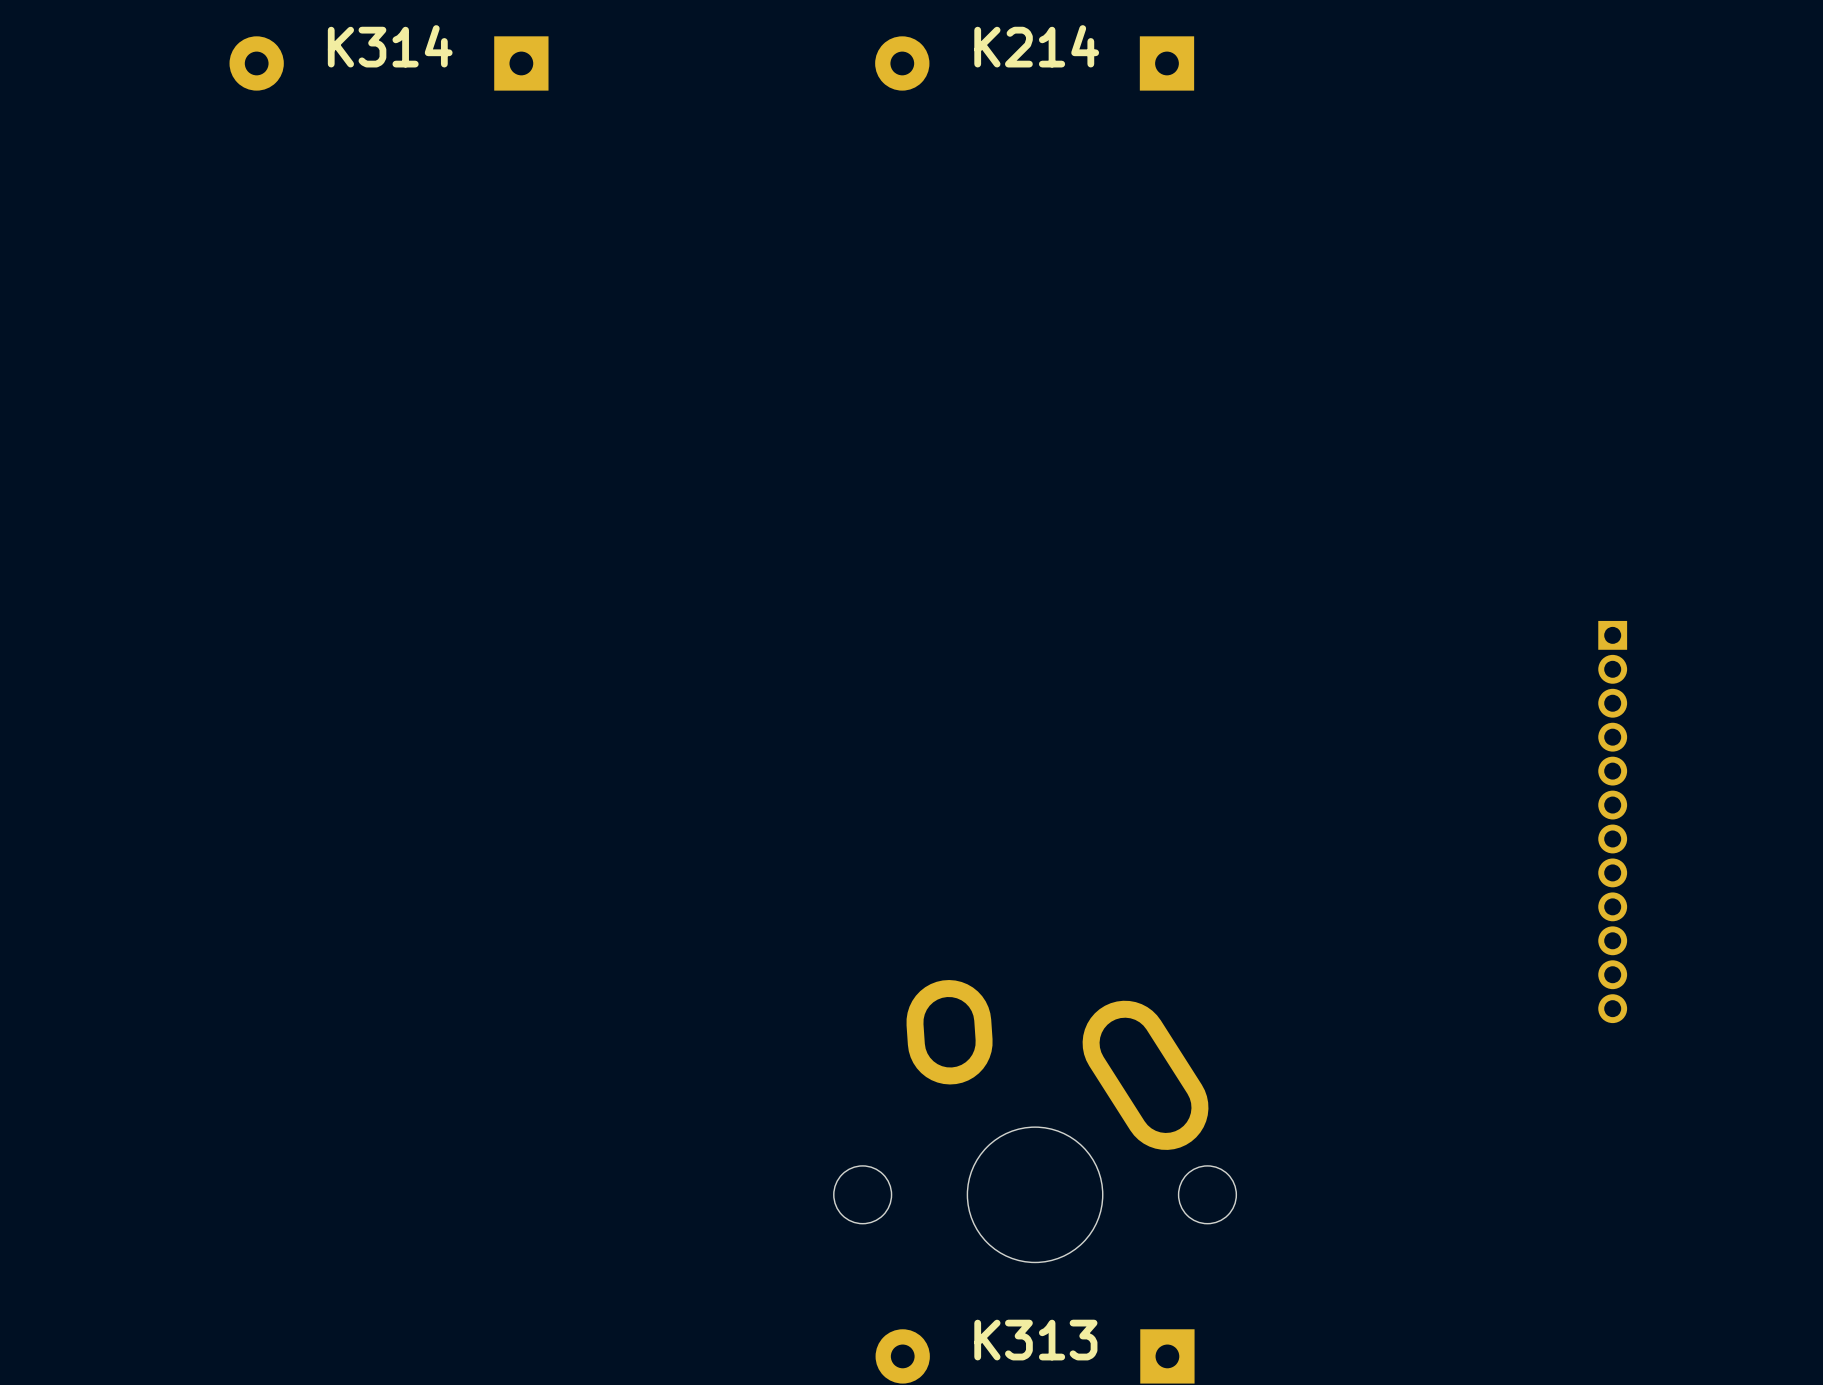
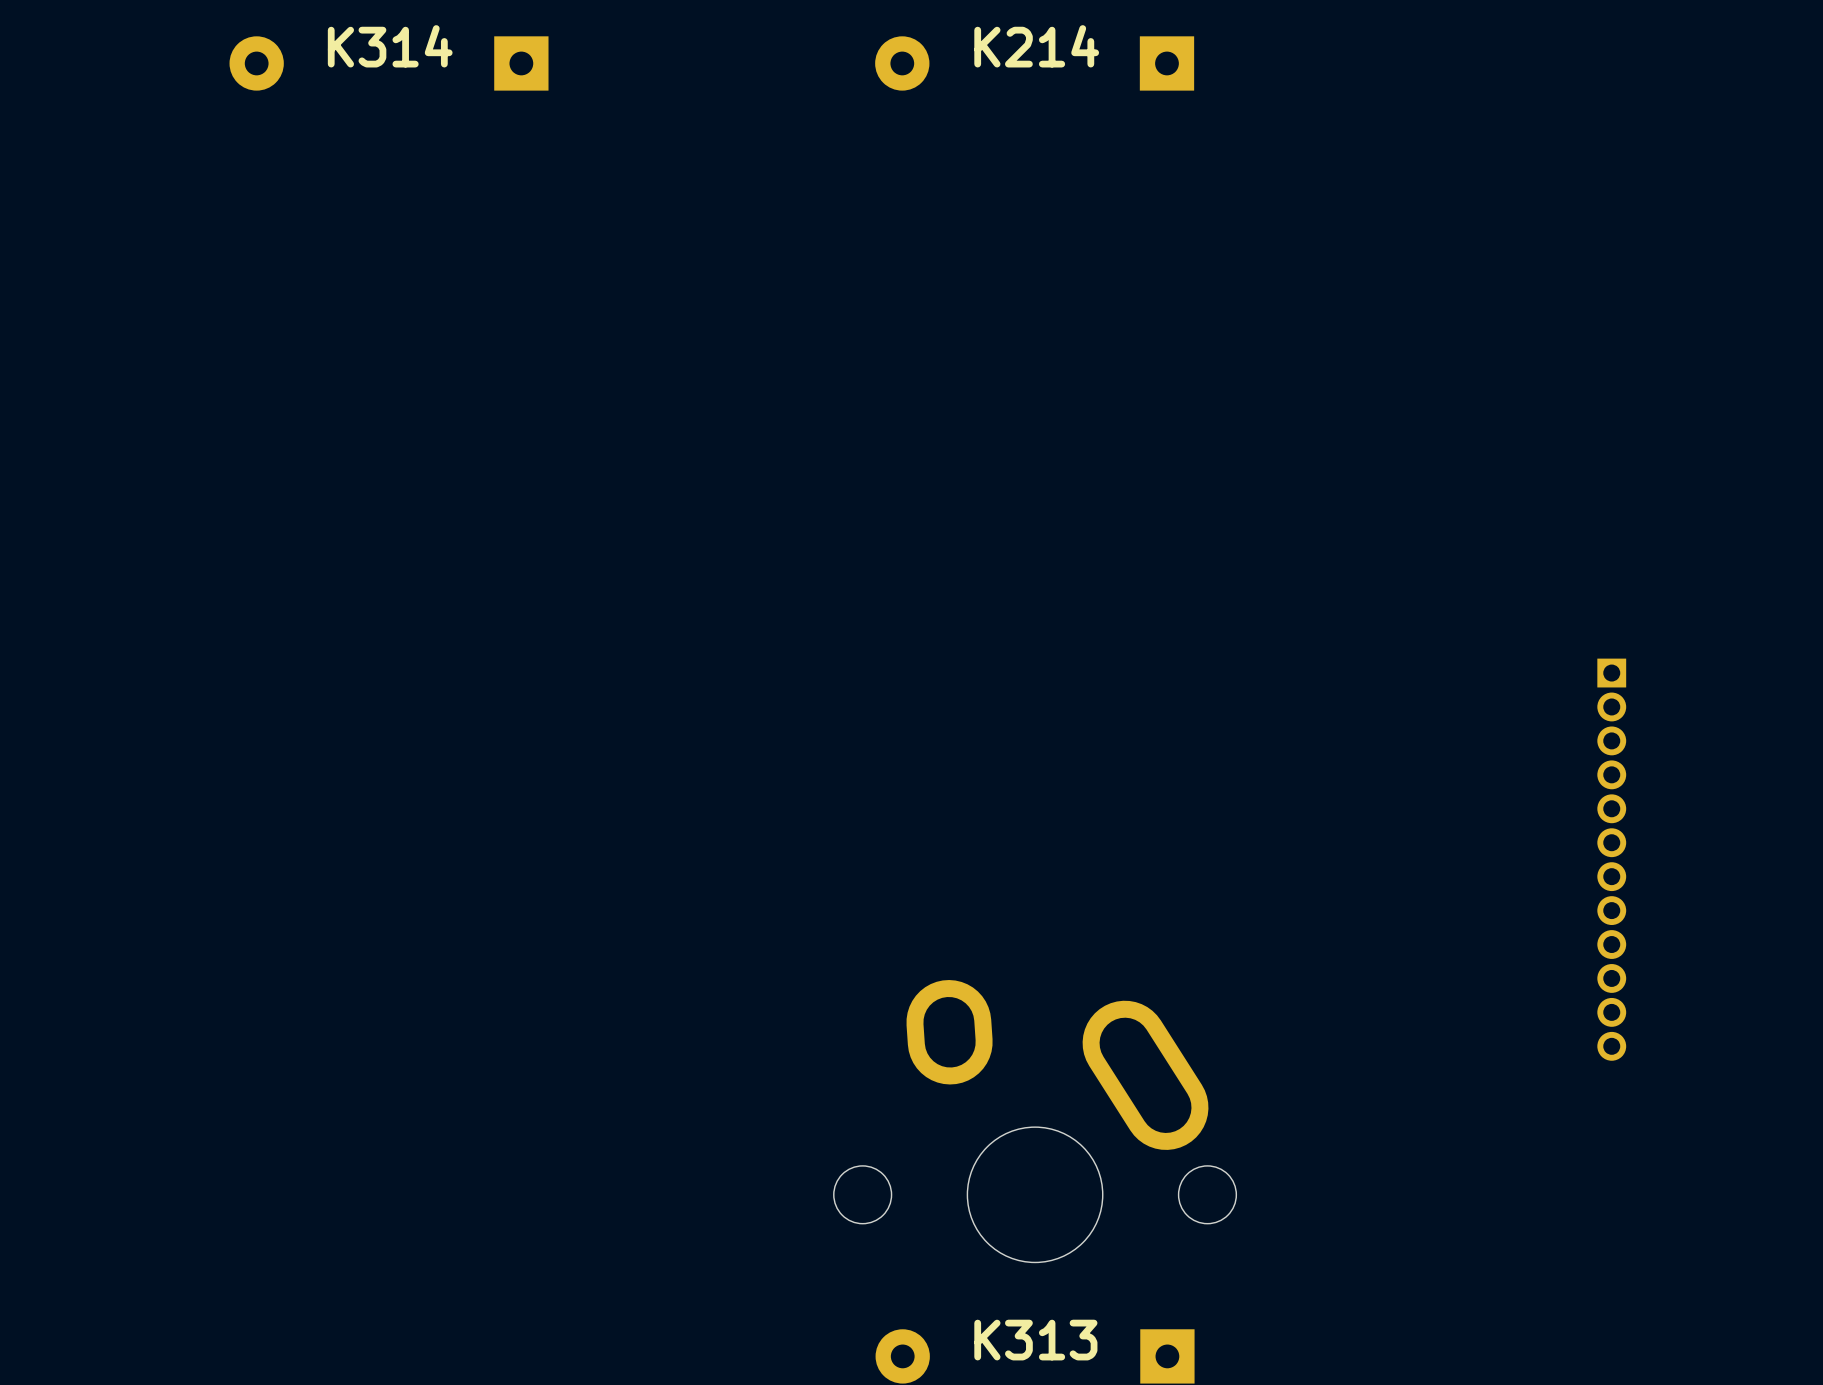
part position: (1612, 822) -> (1611, 859)

